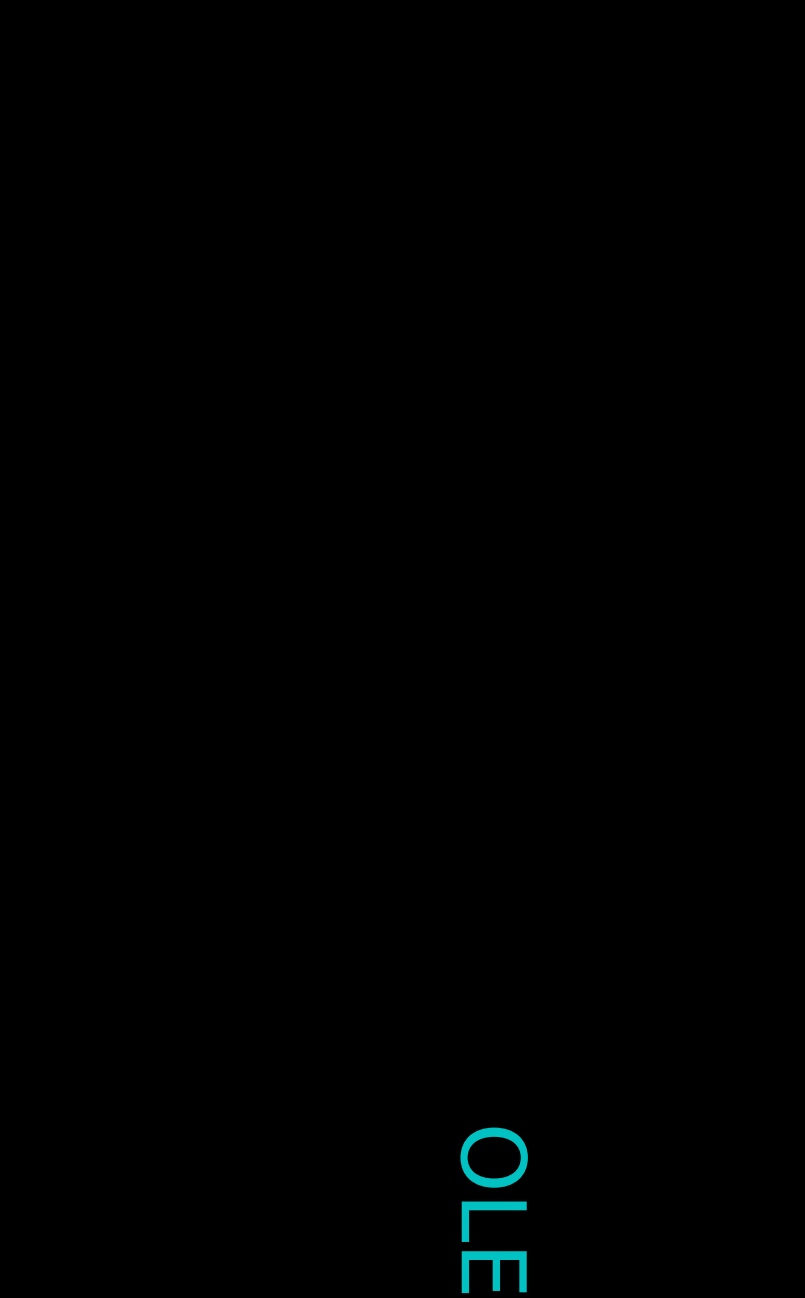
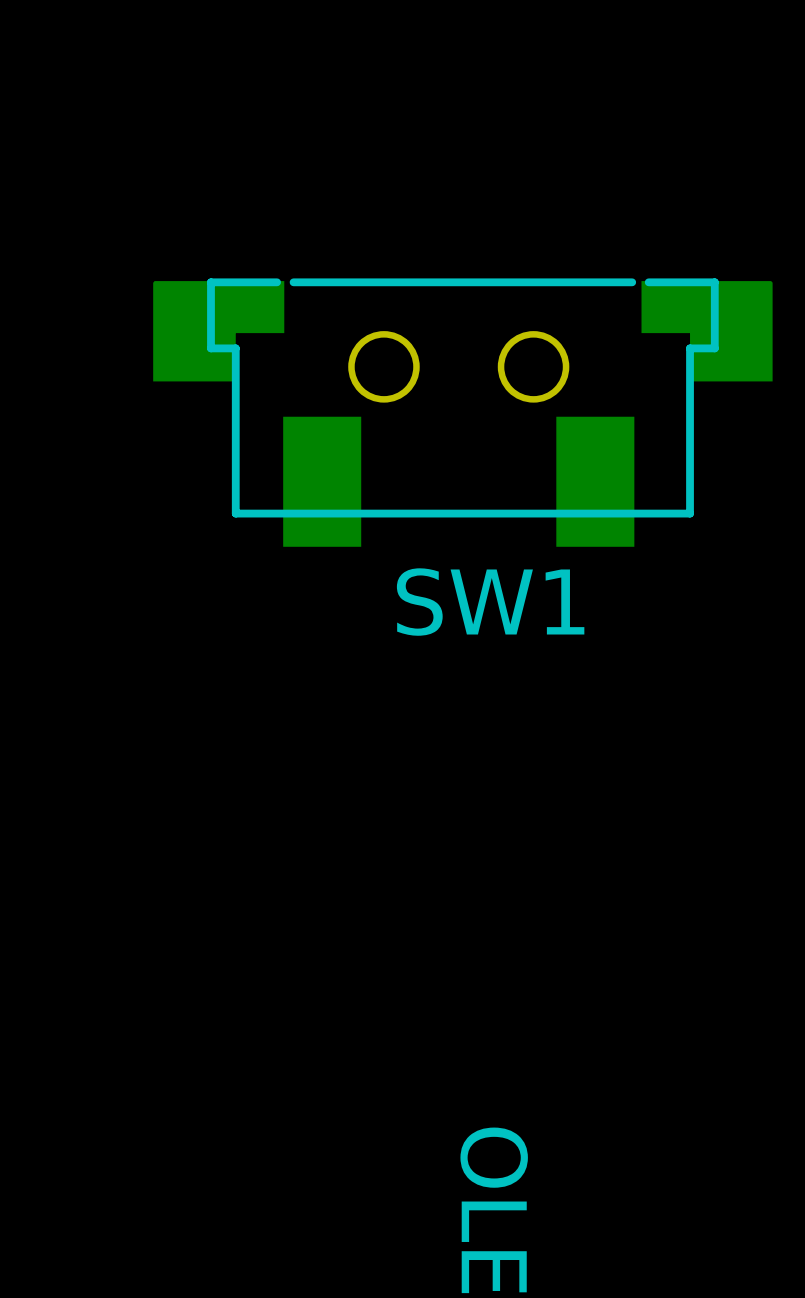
SW1: none -> (462, 412)

